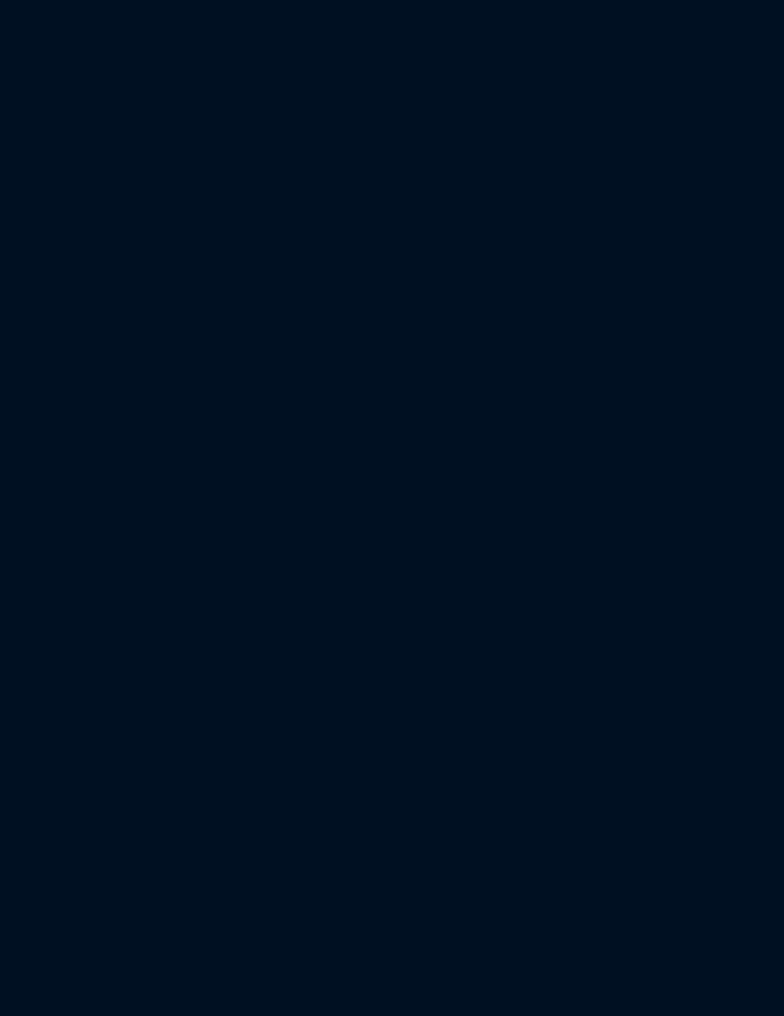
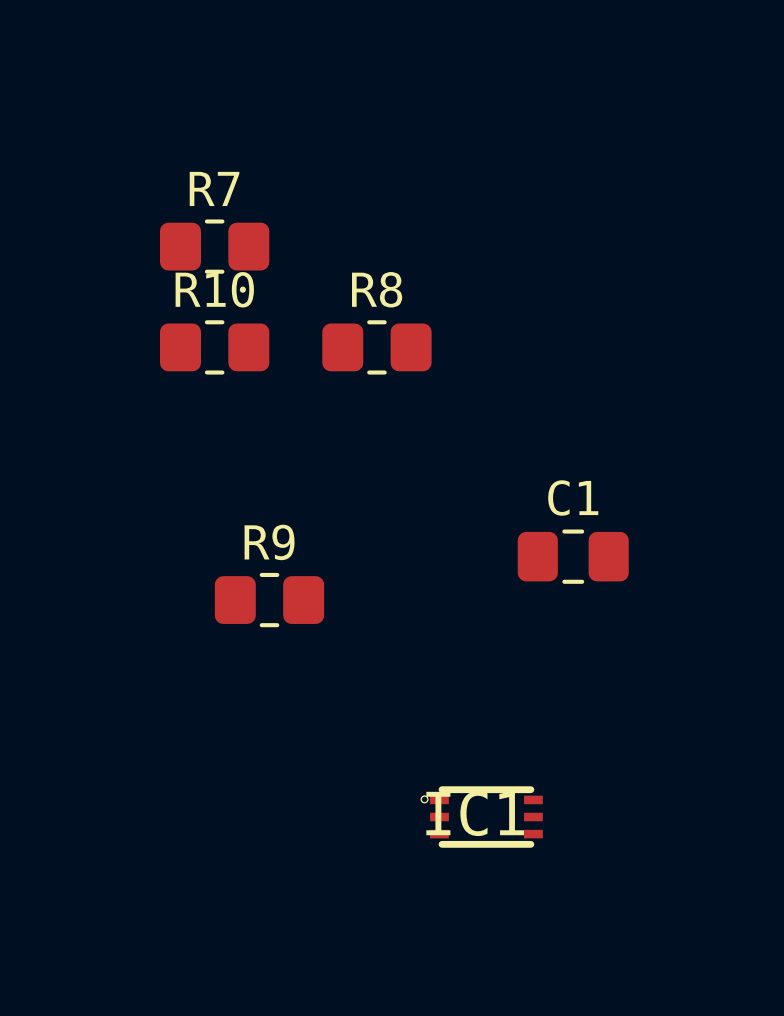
R7: none -> (214, 246)
R10: none -> (214, 347)
R8: none -> (376, 347)
C1: none -> (573, 556)
R9: none -> (269, 600)
IC1: none -> (481, 817)

